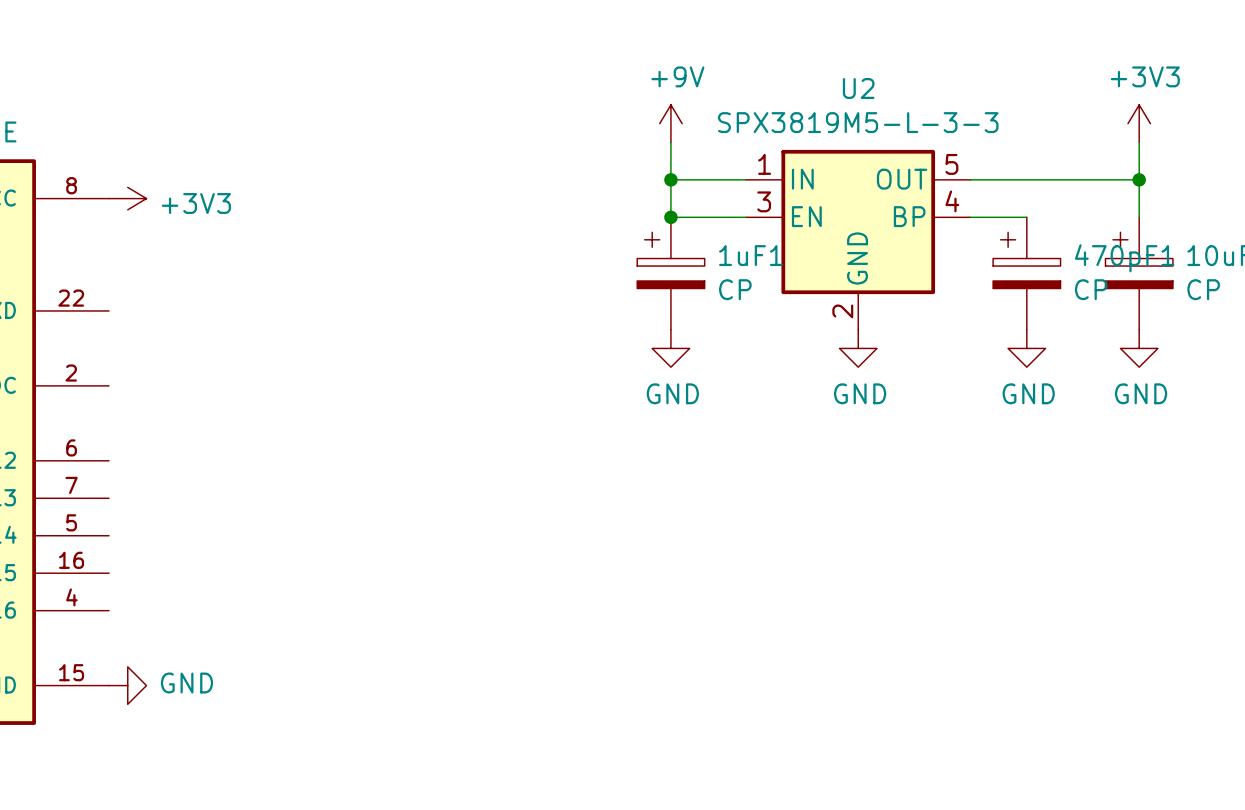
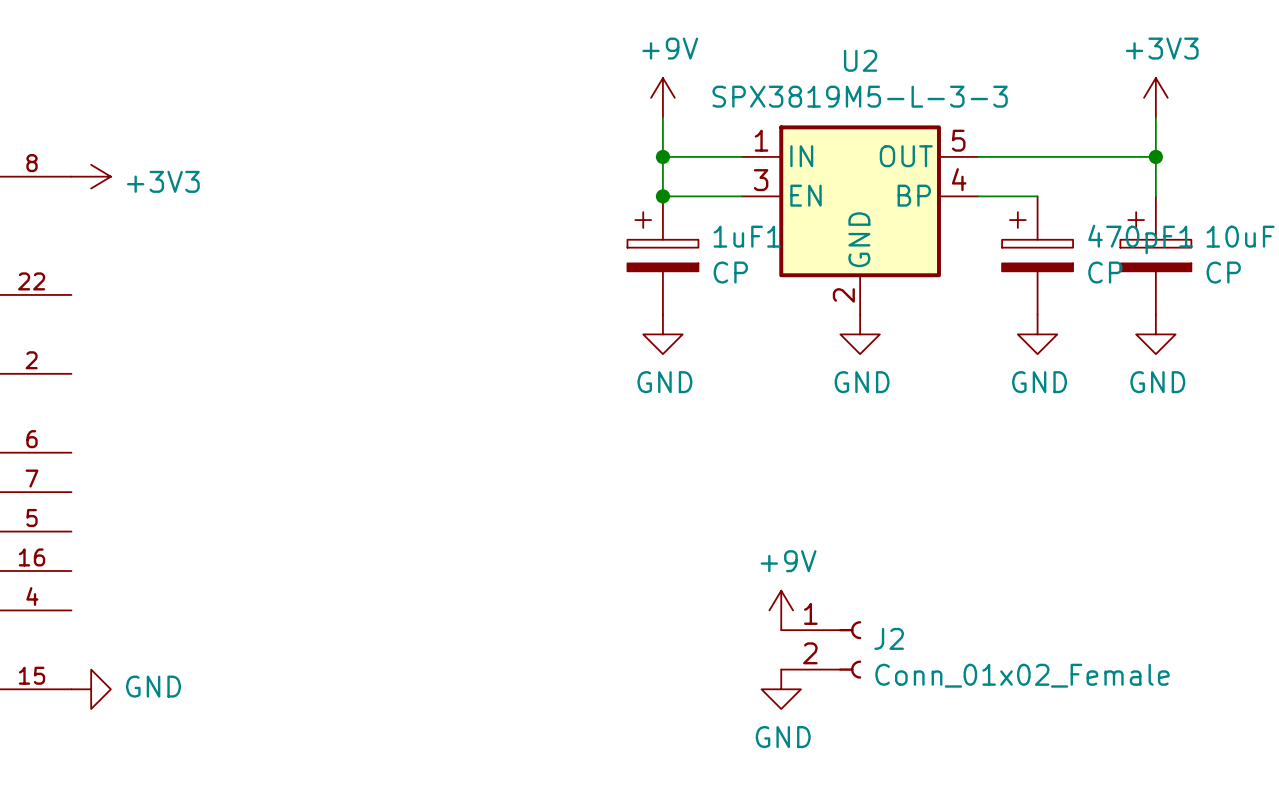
power symbol: none -> +9V (781, 610)
J2: none -> Conn_01x02_Female (821, 649)
power symbol: none -> GND (781, 689)

